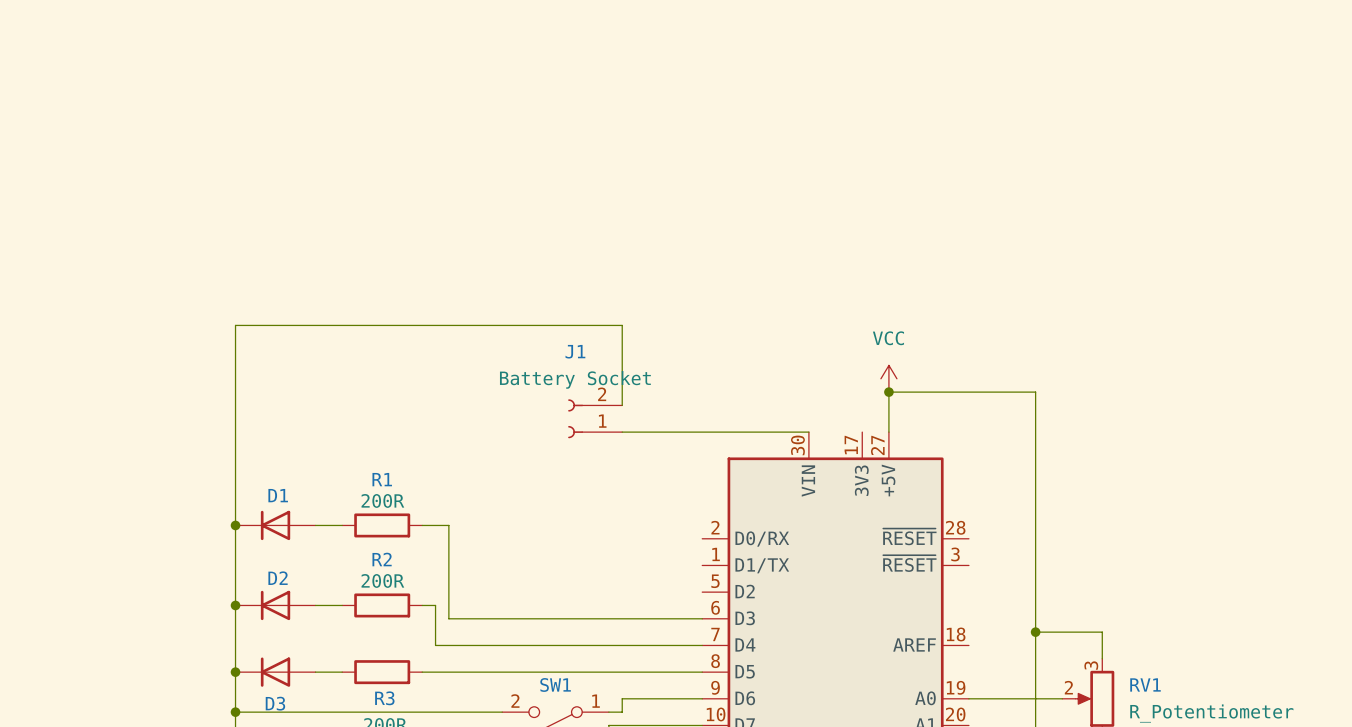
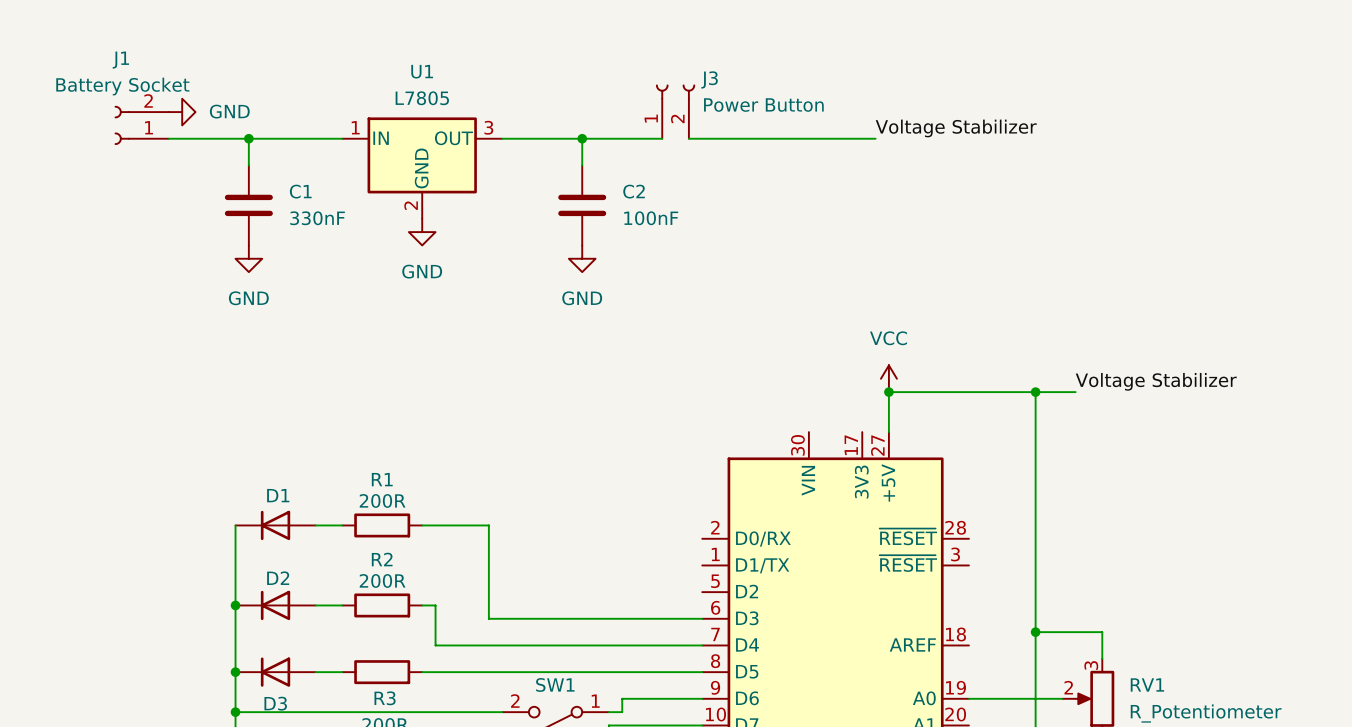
J3: none -> Power Button (675, 111)
power symbol: none -> GND (182, 112)
label: none -> Voltage Stabilizer (956, 128)
wire: none -> (168, 138) (342, 138)
wire: none -> (248, 138) (248, 165)
junction: none -> (248, 138)
wire: none -> (502, 138) (662, 138)
wire: none -> (582, 138) (582, 165)
junction: none -> (582, 138)
wire: none -> (688, 138) (875, 138)
U1: none -> L7805 (422, 168)
C1: none -> 330nF (248, 205)
C2: none -> 100nF (582, 205)
power symbol: none -> GND (422, 232)
power symbol: none -> GND (248, 258)
power symbol: none -> GND (582, 258)
label: none -> Voltage Stabilizer (1156, 381)
wire: none -> (1035, 392) (1075, 392)
junction: none -> (1035, 392)
wire: (622, 405) (622, 325) (235, 325) (235, 525) -> none
J1 position: (595, 418) -> (141, 125)
wire: (622, 432) (808, 432) -> none
junction: (235, 525) -> none
wire: (448, 525) (448, 618) (488, 618) -> (448, 525) (488, 525) (488, 618)

